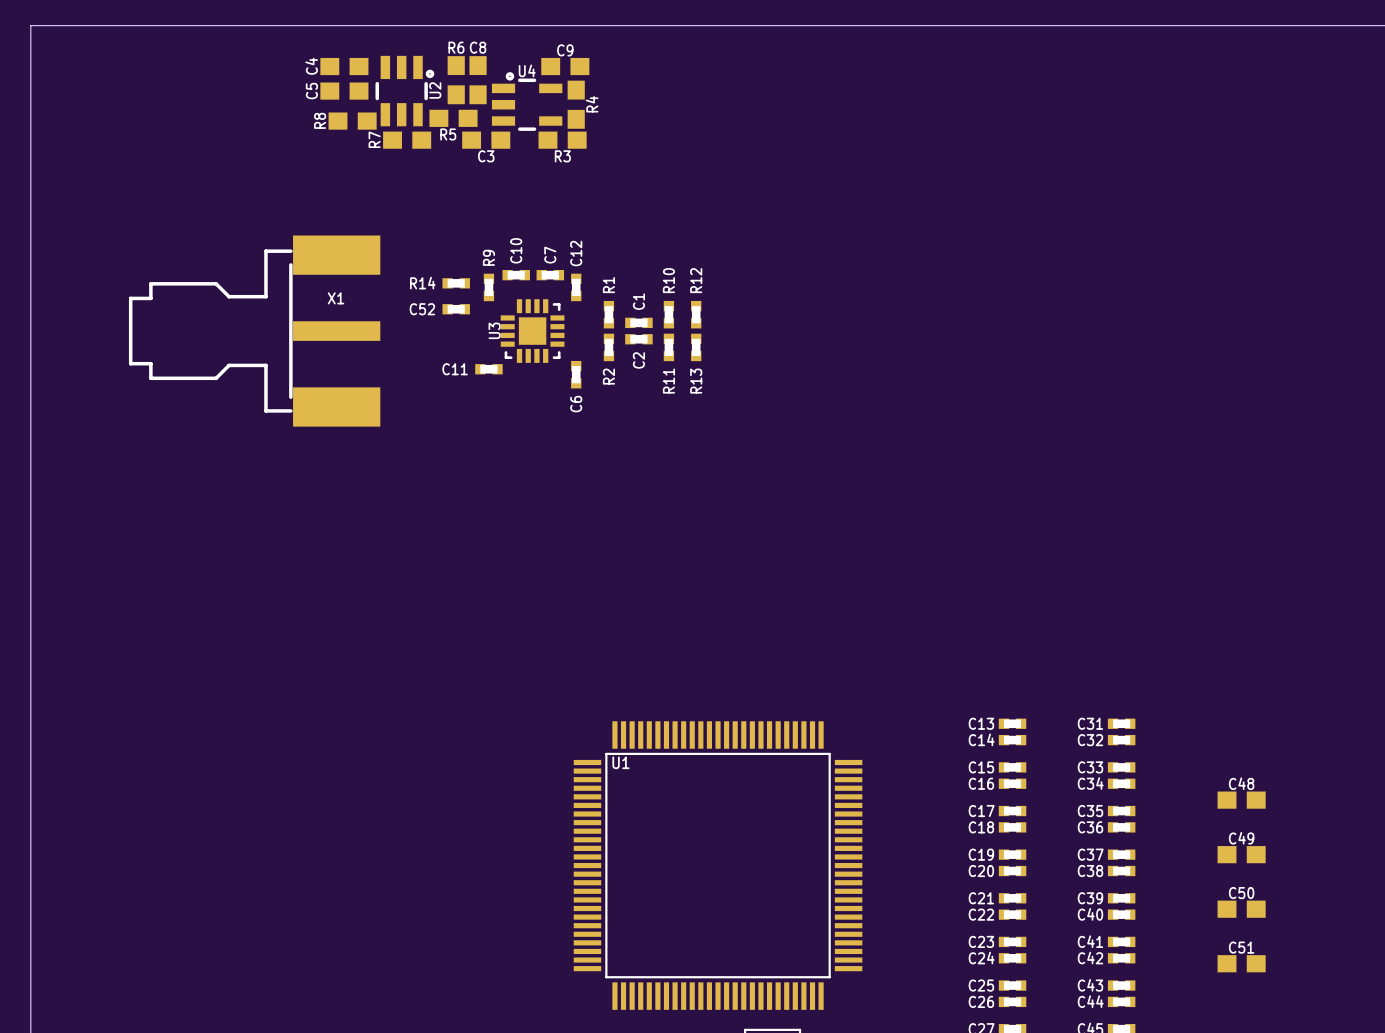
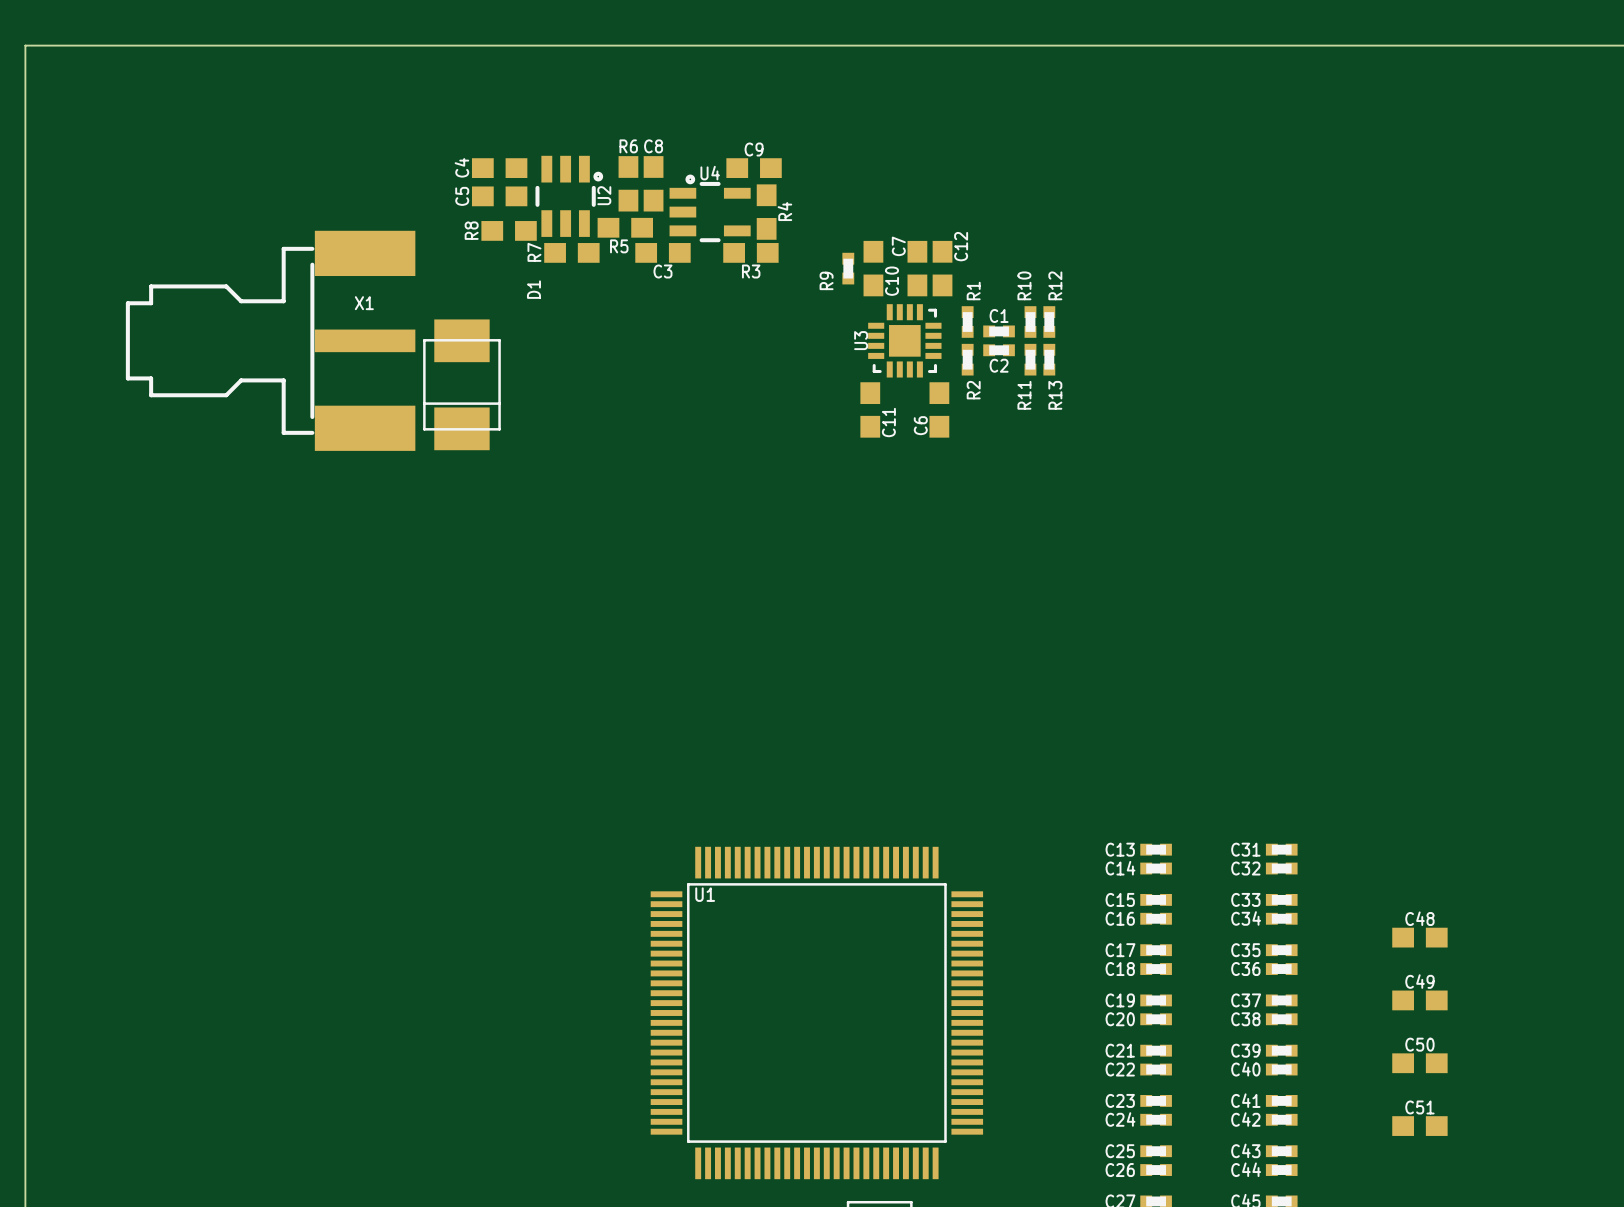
C4 position: (344, 66) -> (499, 168)
C9 position: (565, 66) -> (754, 168)
R6 position: (456, 80) -> (628, 183)
C8 position: (478, 80) -> (653, 183)
C5 position: (344, 91) -> (499, 196)
U2 position: (404, 91) -> (569, 196)
U4 position: (527, 101) -> (710, 208)
R4 position: (576, 104) -> (766, 212)
R5 position: (453, 118) -> (625, 227)
R8 position: (352, 121) -> (509, 230)
R7 position: (407, 140) -> (571, 252)
C3 position: (486, 140) -> (662, 252)
R3 position: (562, 140) -> (750, 252)
C10 name position: C10 (516, 250) -> C10 (892, 281)
R9 name position: R9 (488, 257) -> R9 (826, 280)
C10 footprint: [502, 270, 530, 281] -> [863, 240, 884, 297]
C7 footprint: [536, 270, 565, 281] -> [907, 240, 928, 297]
C12 footprint: [571, 273, 582, 302] -> [932, 240, 953, 297]
R10 name position: R10 (668, 280) -> R10 (1024, 285)
R12 name position: R12 (696, 280) -> R12 (1055, 285)
R14: (456, 283) -> none
R1 name position: R1 (608, 285) -> R1 (973, 291)
R9 position: (488, 287) -> (848, 268)
C1 name rotation: 0° (638, 301) -> 90° clockwise (999, 315)
C52: (456, 309) -> none
R1 position: (608, 314) -> (967, 322)
R10 position: (668, 314) -> (1030, 322)
R12 position: (696, 314) -> (1049, 322)
D1: none -> (461, 384)
C1 position: (638, 322) -> (999, 331)
X1 position: (254, 331) -> (270, 340)
U3 position: (532, 331) -> (904, 340)
C2 position: (638, 339) -> (999, 350)
R2 position: (608, 347) -> (967, 359)
R11 position: (668, 347) -> (1030, 359)
R13 position: (696, 347) -> (1049, 359)
C6 footprint: [571, 360, 582, 389] -> [929, 382, 950, 438]
C2 name rotation: 0° (638, 360) -> 90° clockwise (999, 365)
C11 footprint: [475, 364, 503, 375] -> [860, 382, 881, 438]
C11 name position: C11 (455, 369) -> C11 (888, 422)
R2 name position: R2 (608, 376) -> R2 (973, 390)
R11 name position: R11 (668, 381) -> R11 (1024, 395)
R13 name position: R13 (696, 381) -> R13 (1055, 395)

